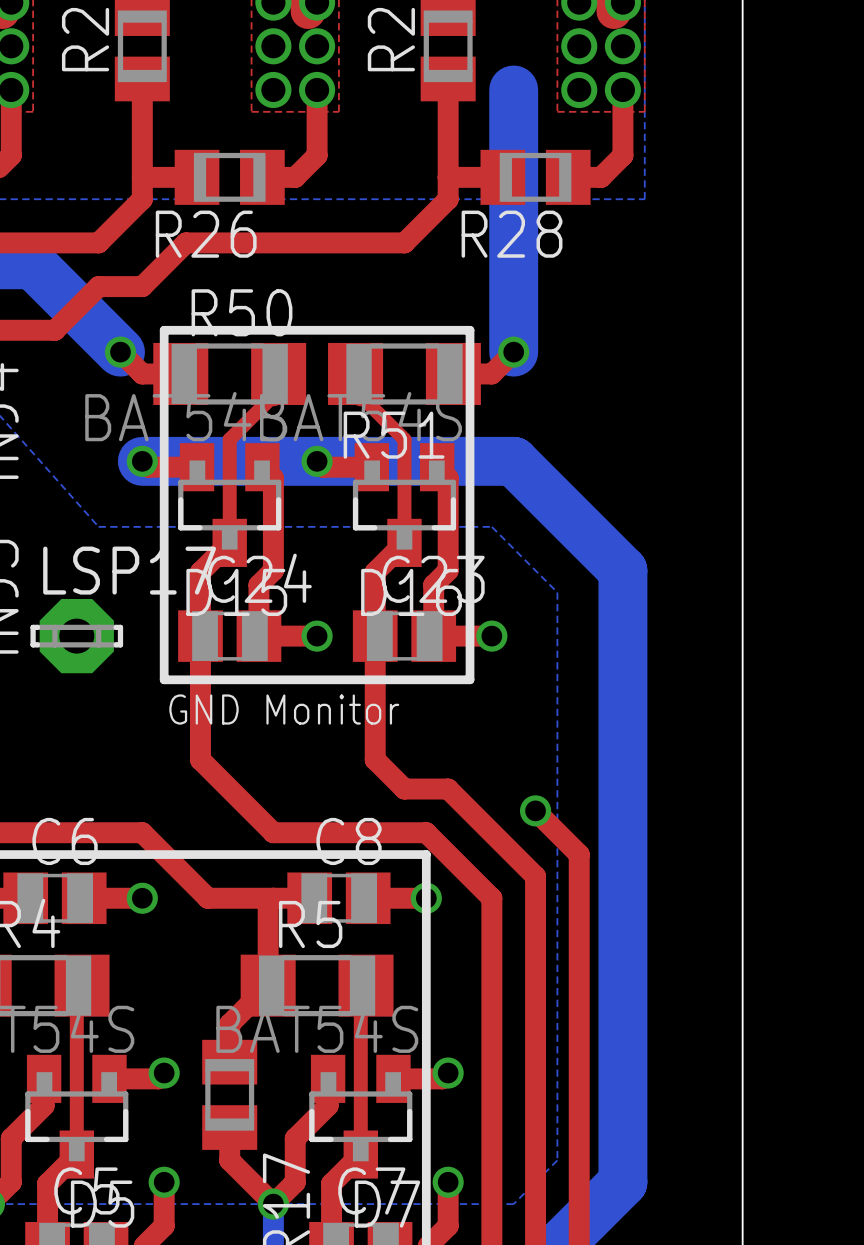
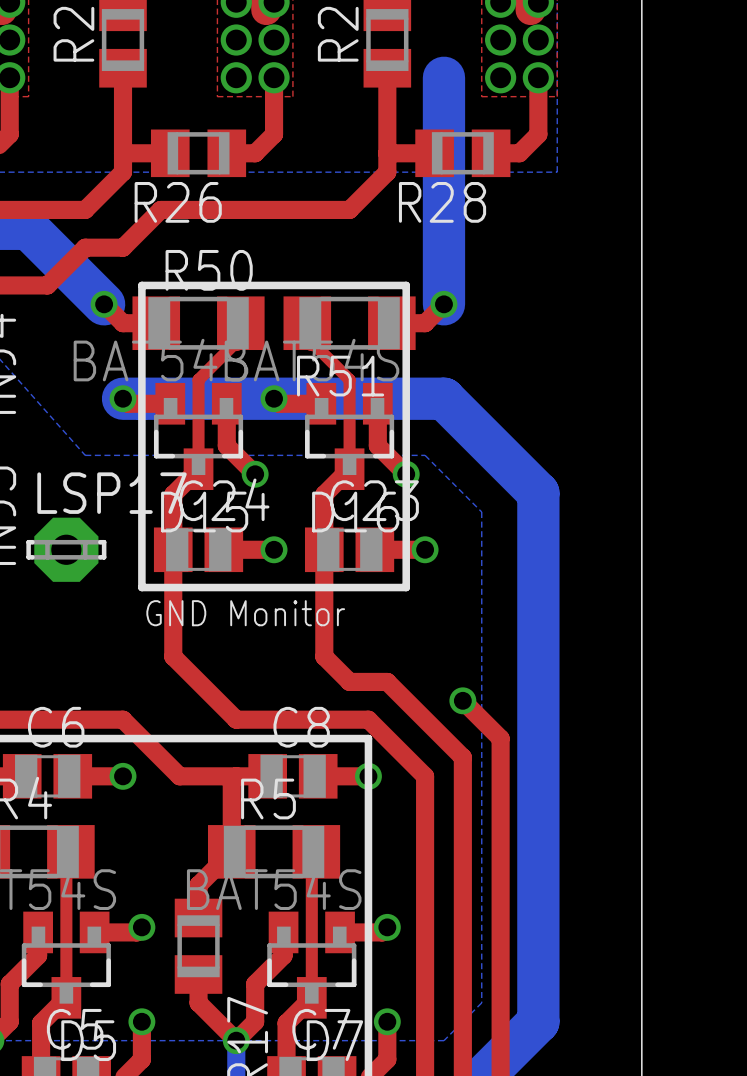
top track: (262, 467) (273, 478) (273, 570) (258, 585) (258, 636) -> (226, 403) (226, 445) (255, 474)
top track: (437, 467) (448, 478) (448, 570) (433, 585) (433, 636) -> (377, 403) (377, 445) (406, 474)
via: none -> (255, 474)
via: none -> (406, 474)

